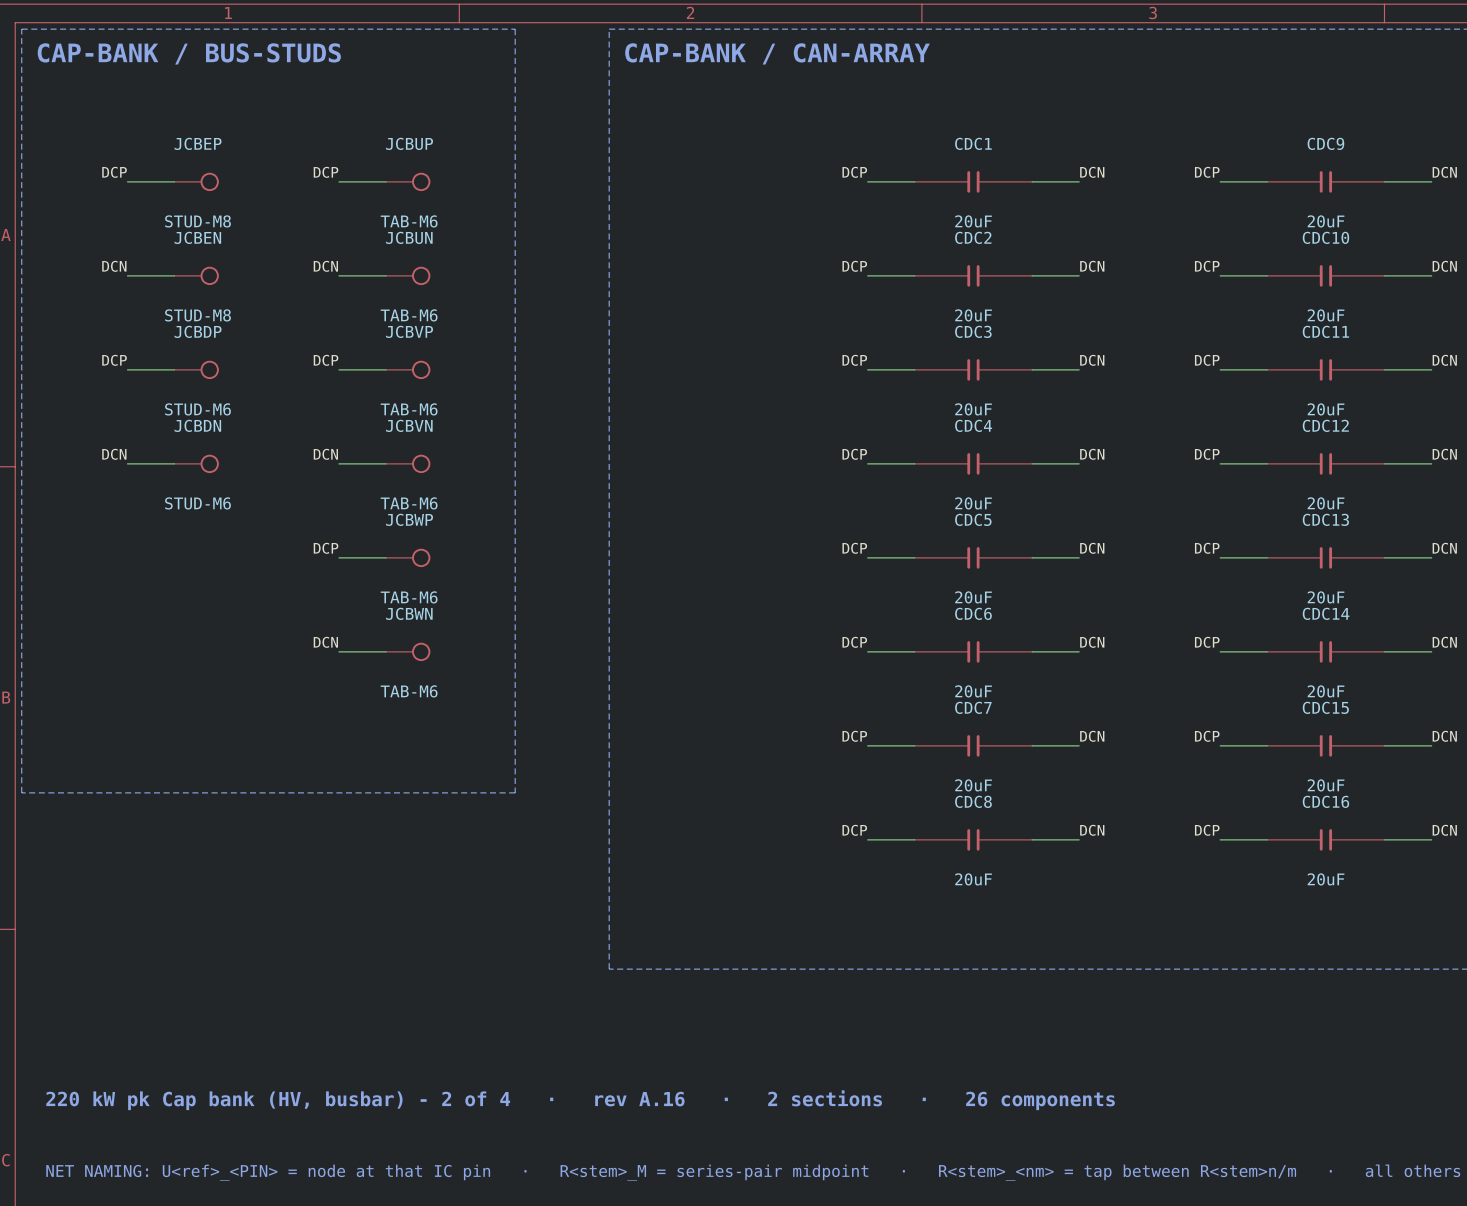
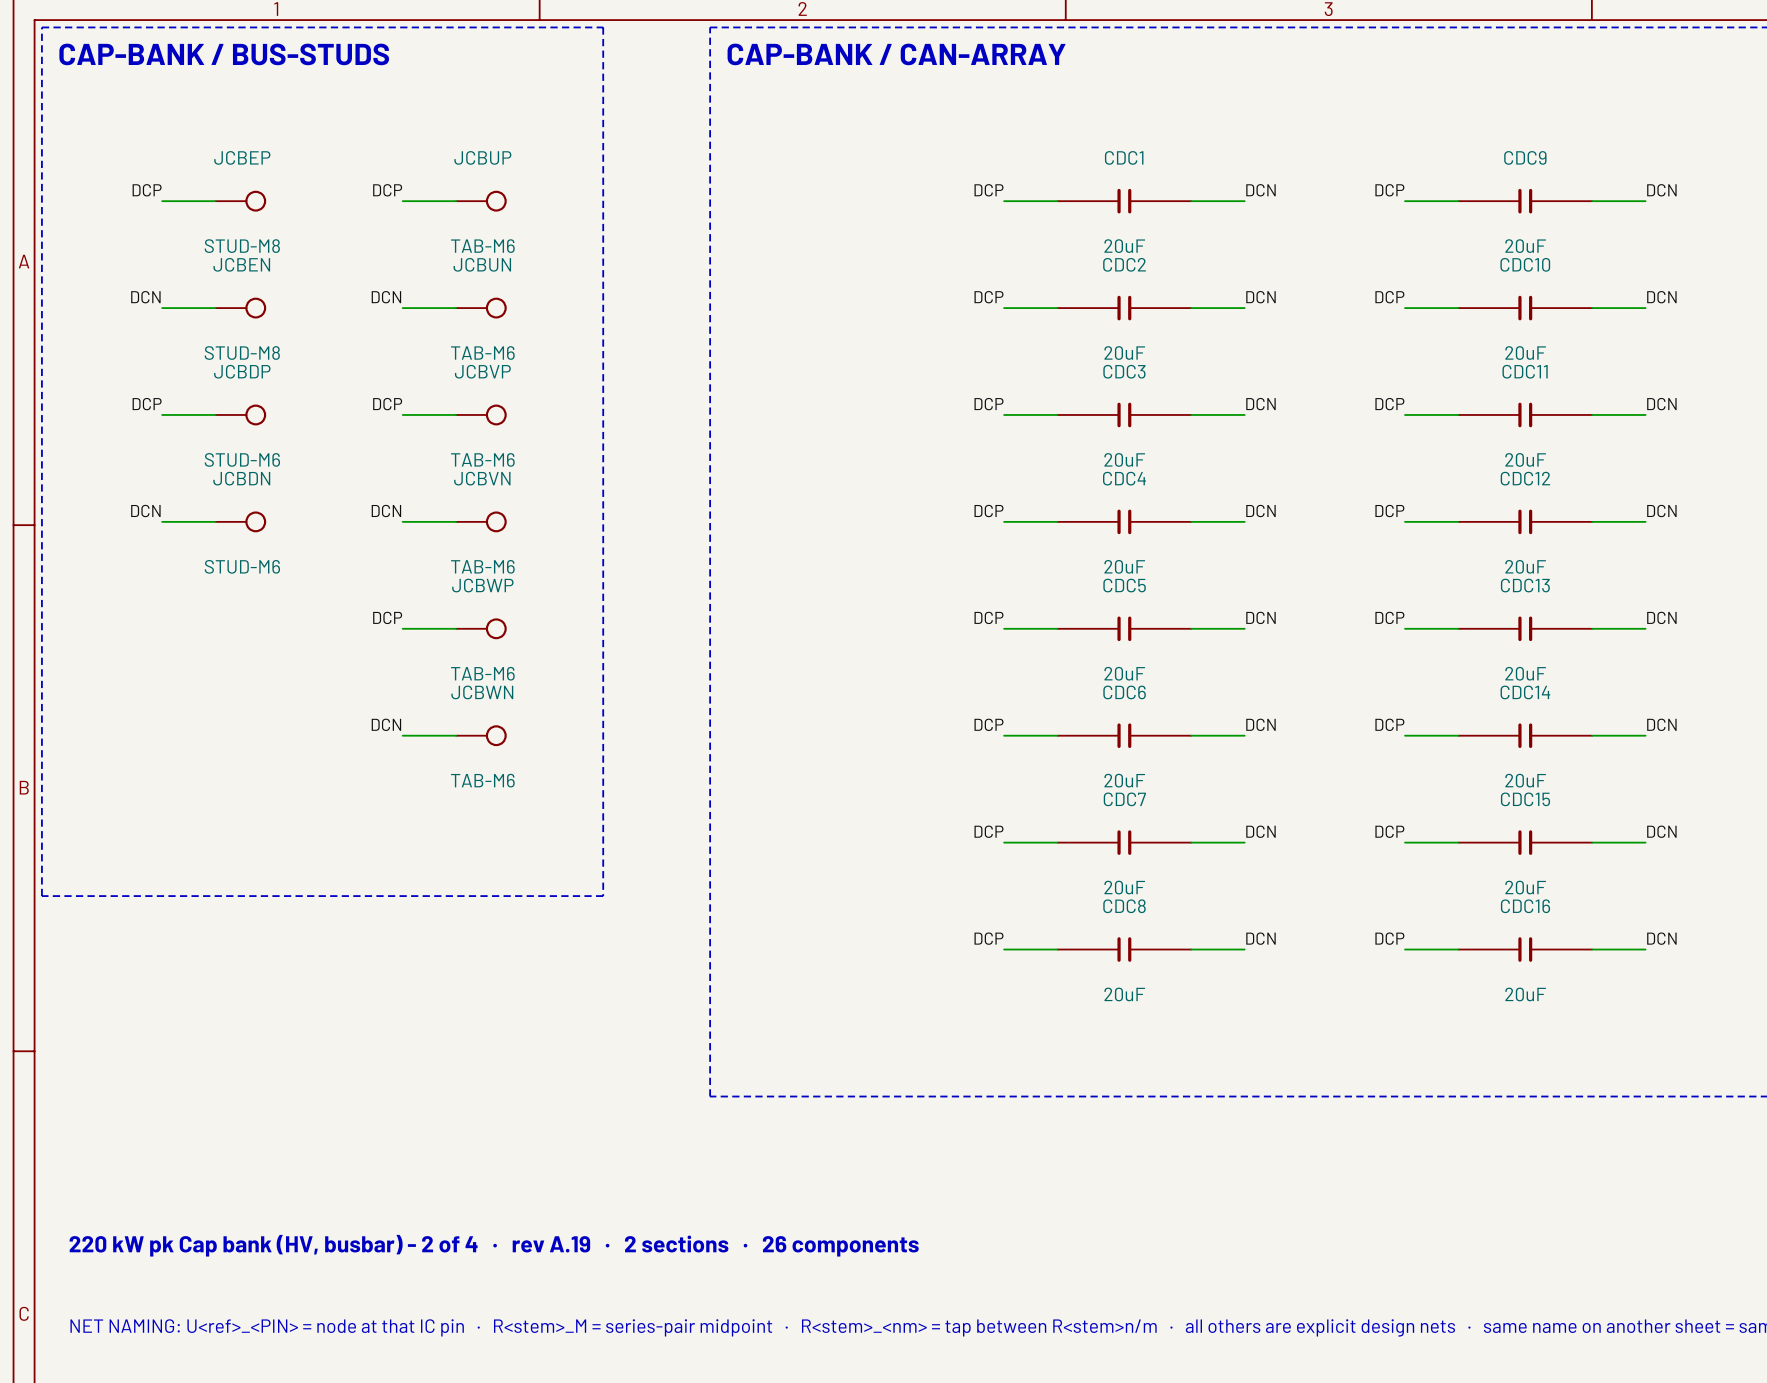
text: 220 kW pk Cap bank (HV, busbar) - 2 of 4 · rev A.16 · 2 sections · 26 components (580, 1100) -> 220 kW pk Cap bank (HV, busbar) - 2 of 4 · rev A.19 · 2 sections · 26 components (494, 1245)

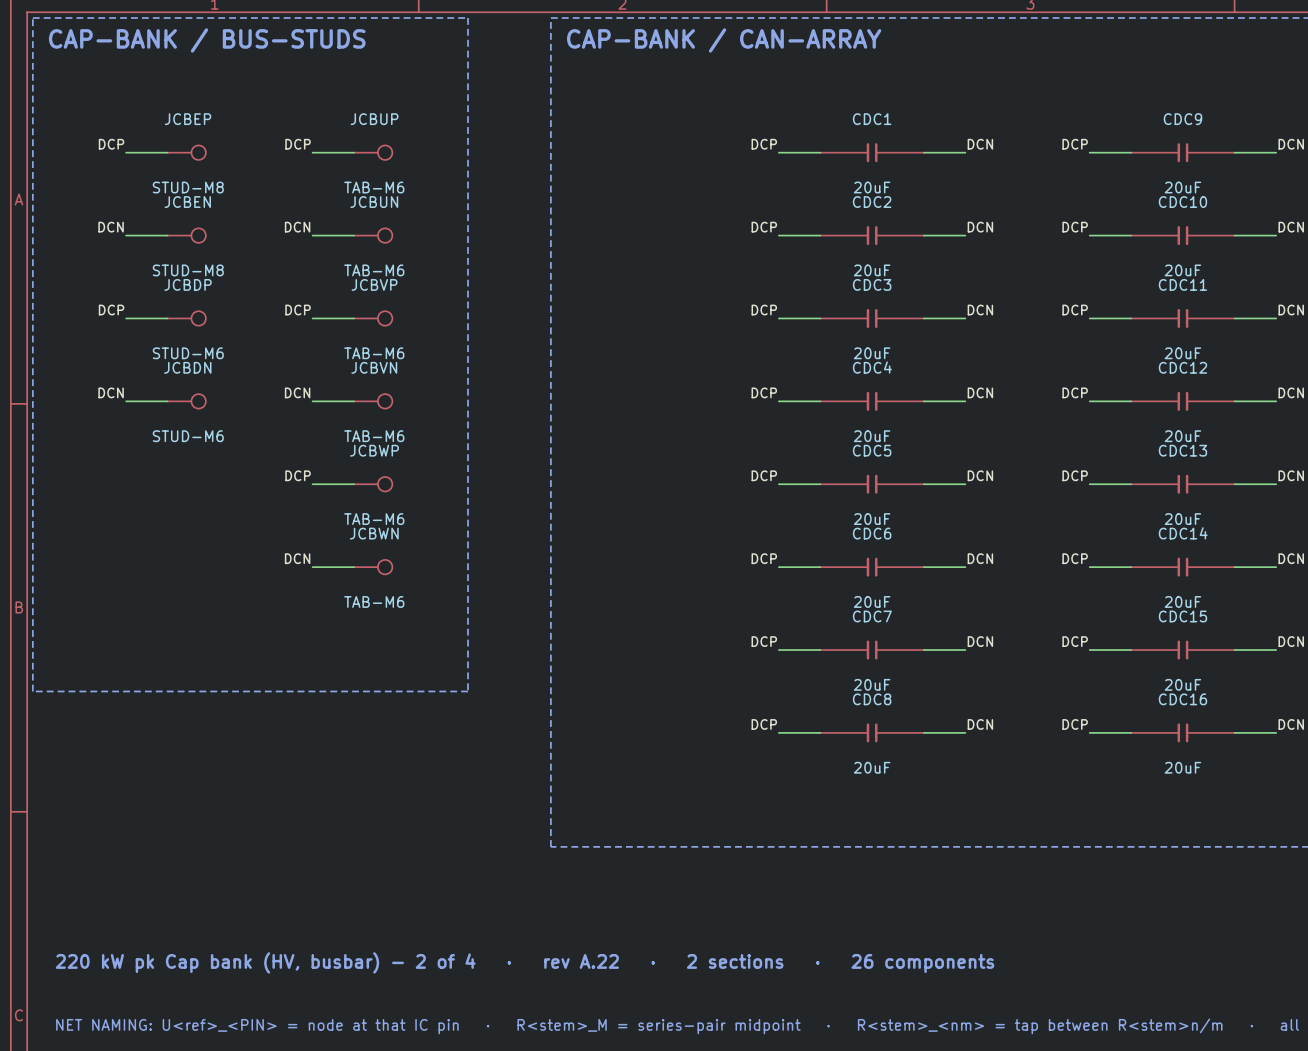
text: 220 kW pk Cap bank (HV, busbar) - 2 of 4 · rev A.19 · 2 sections · 26 components (494, 1245) -> 220 kW pk Cap bank (HV, busbar) - 2 of 4 · rev A.22 · 2 sections · 26 components (525, 962)

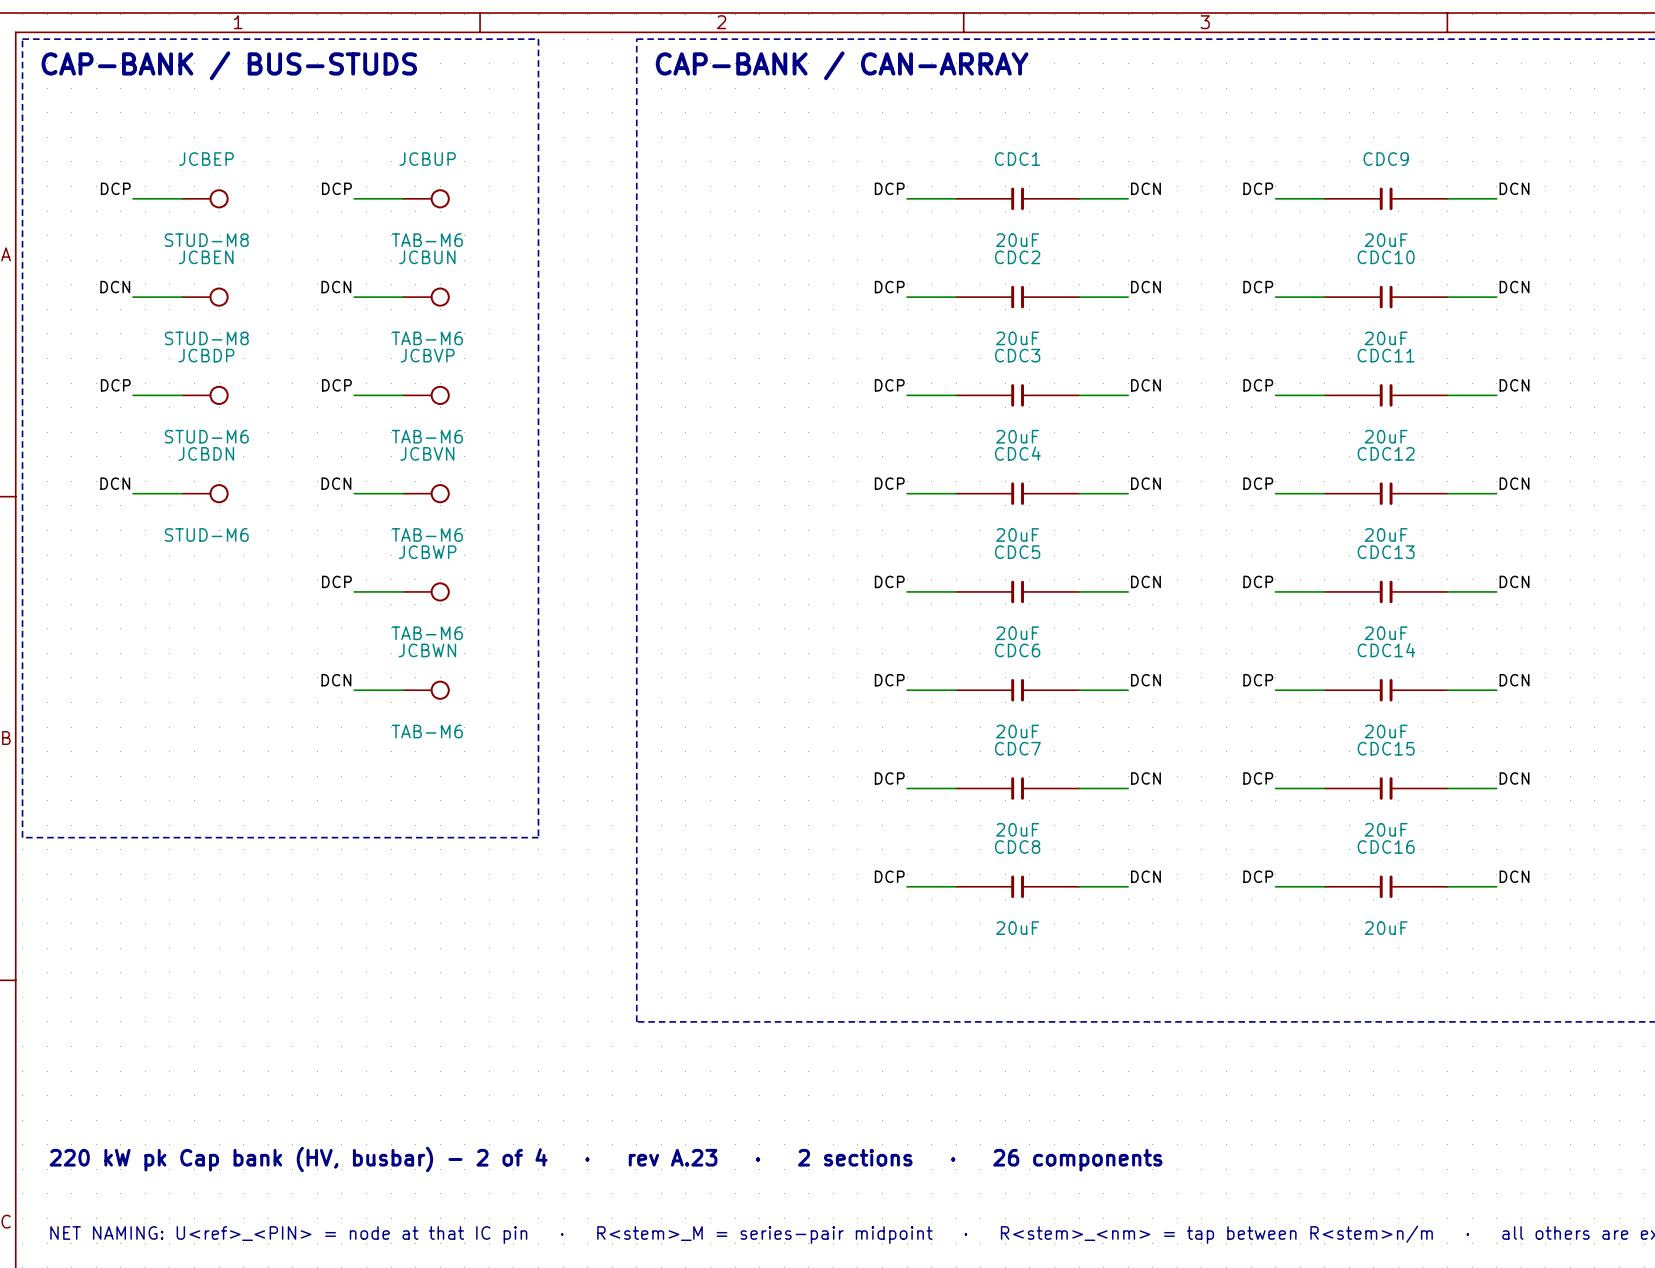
text: 220 kW pk Cap bank (HV, busbar) - 2 of 4 · rev A.22 · 2 sections · 26 components (525, 962) -> 220 kW pk Cap bank (HV, busbar) - 2 of 4 · rev A.23 · 2 sections · 26 components (606, 1159)

